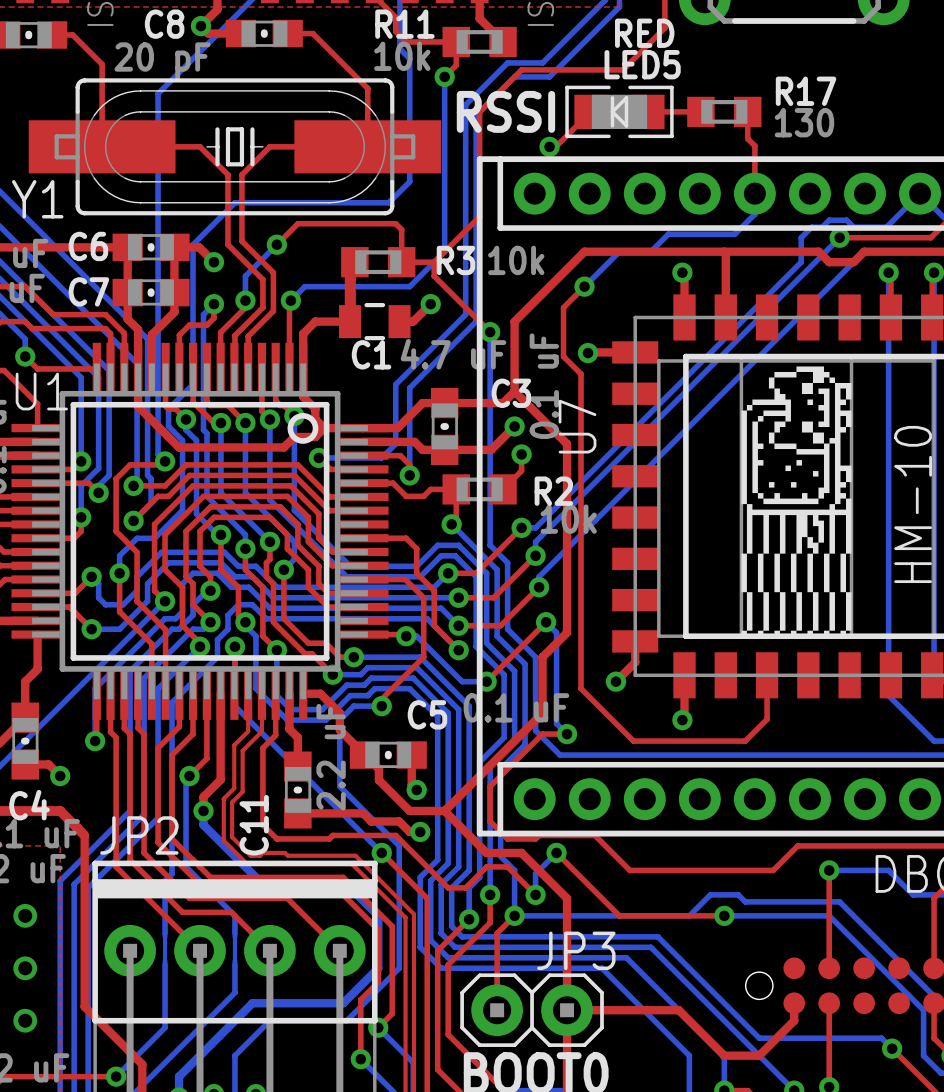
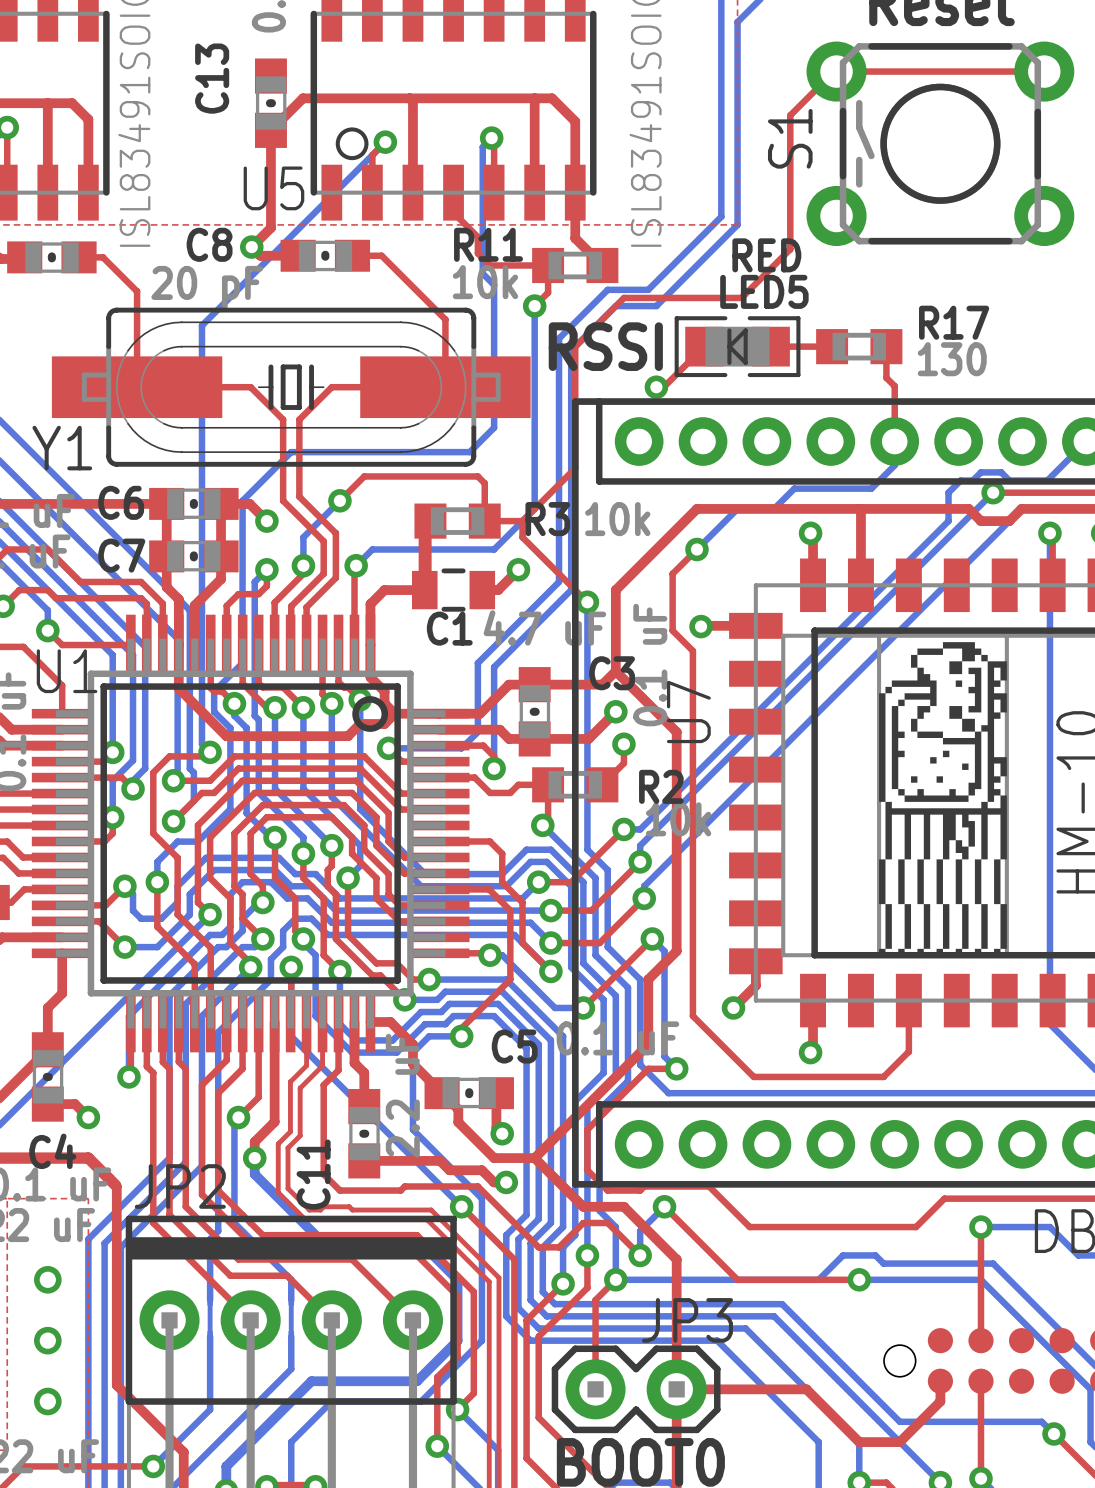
JP3 footprint: [460, 973, 604, 1047] -> [551, 1345, 721, 1434]

